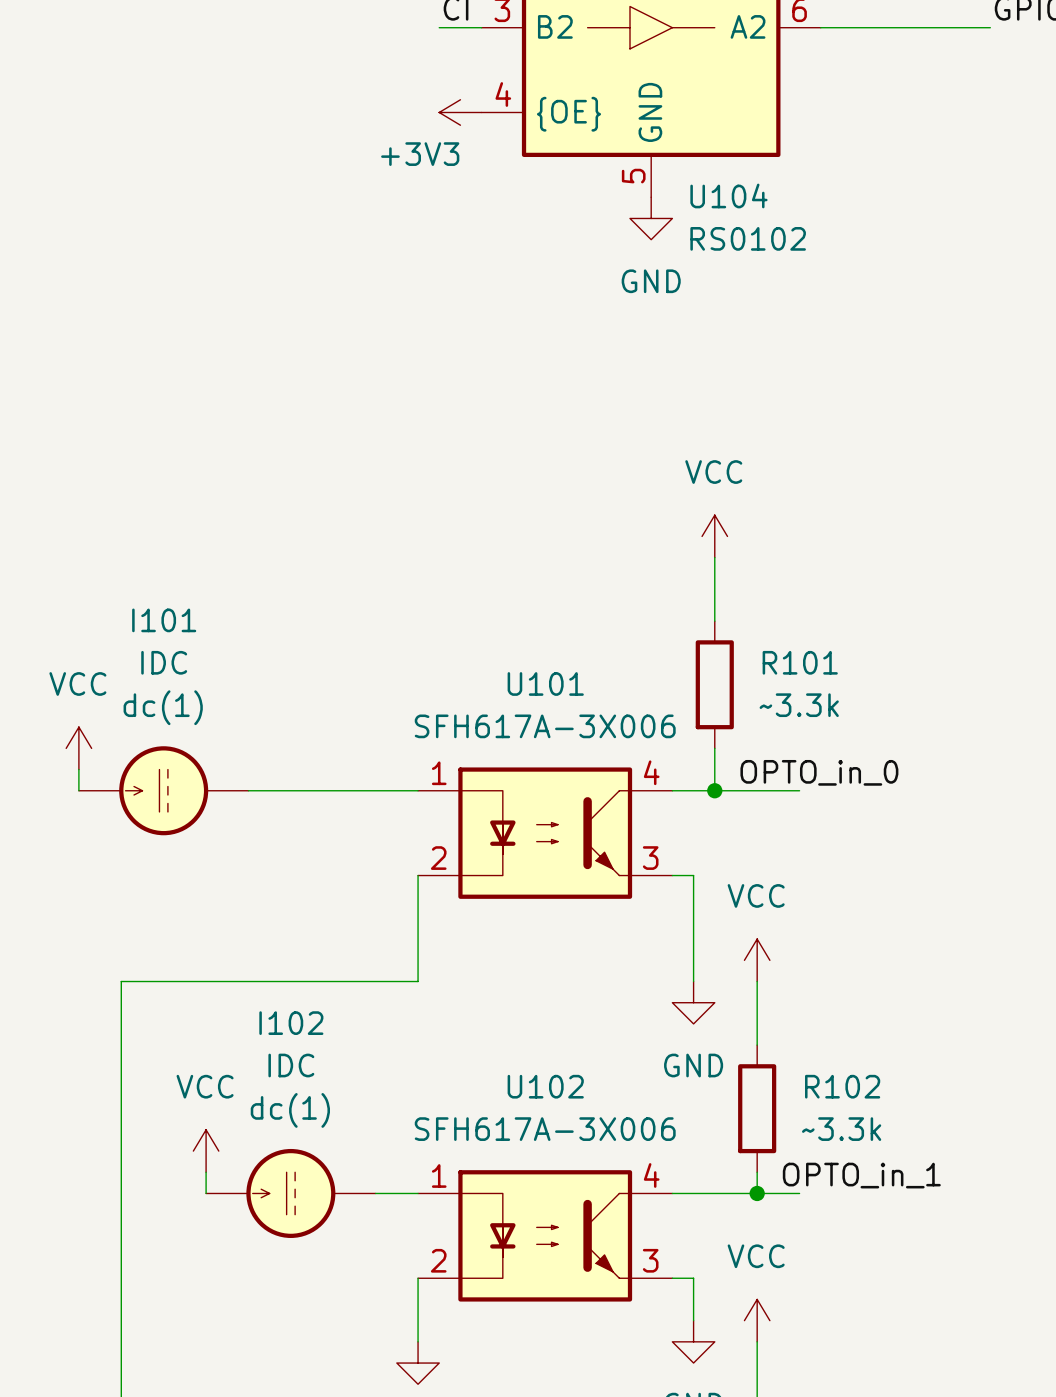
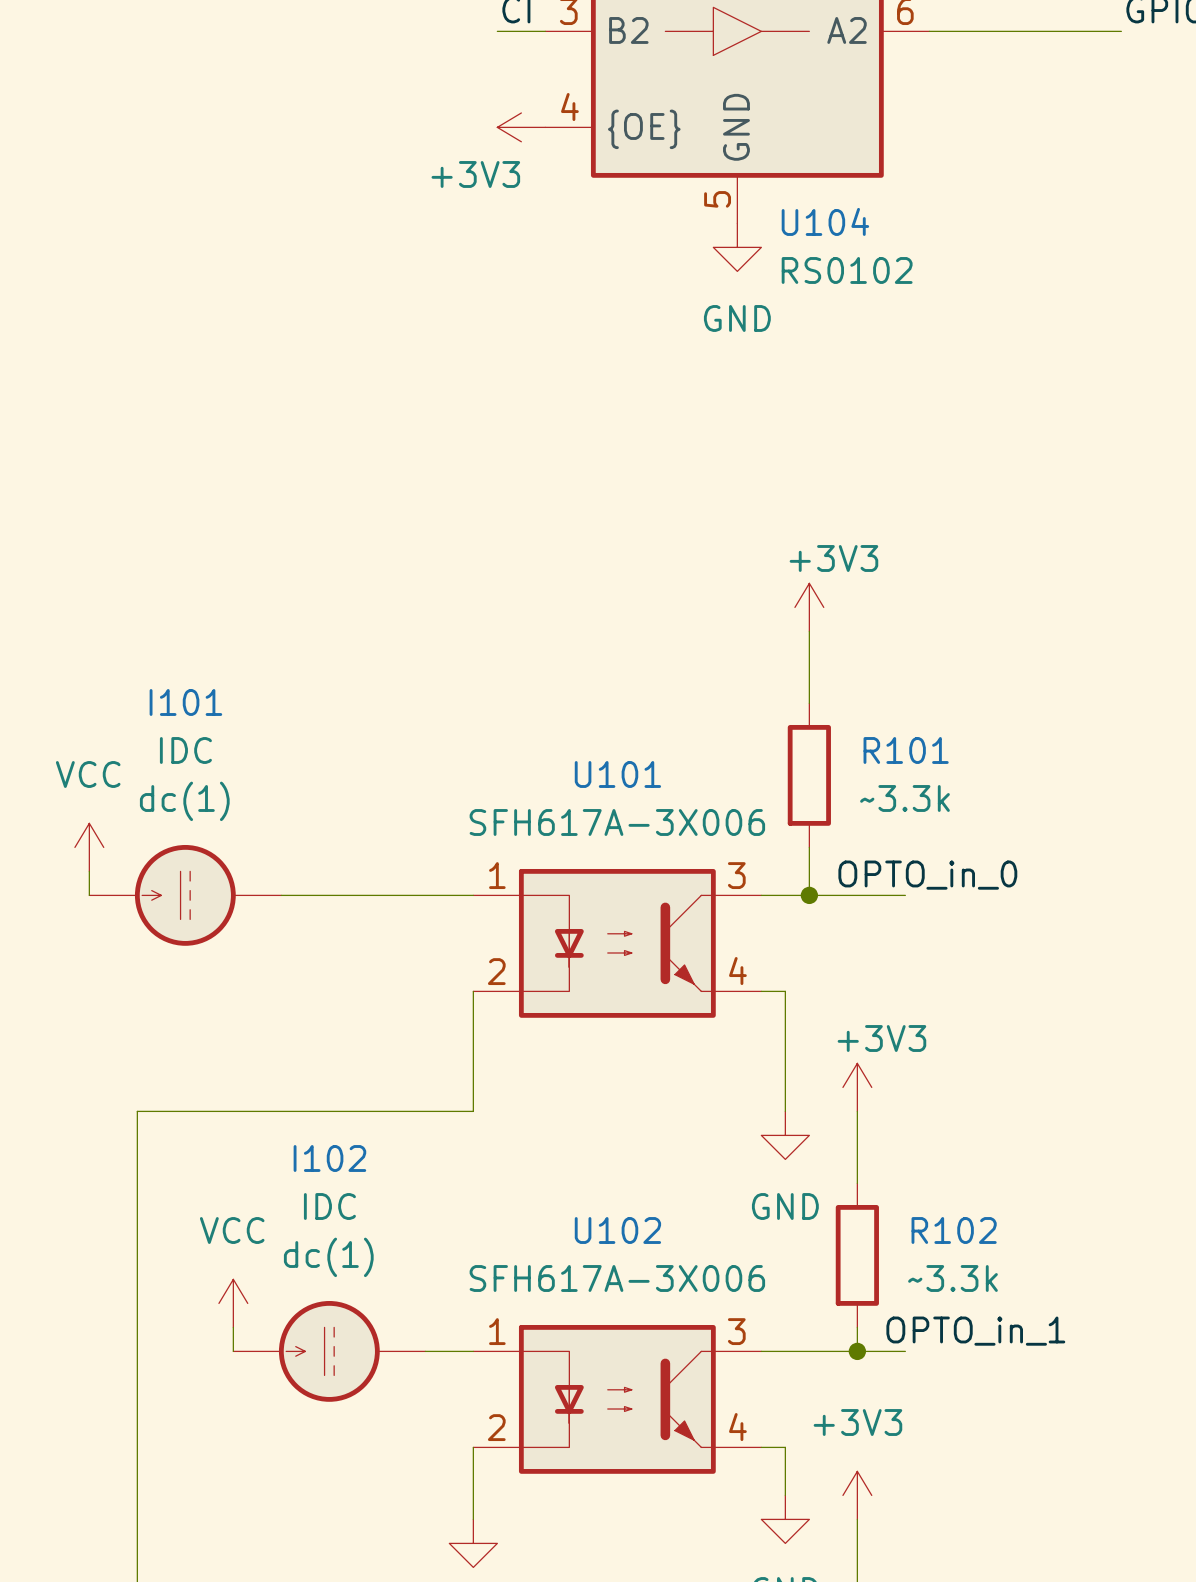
power symbol: VCC (714, 536) -> +3V3 (809, 607)
U101 pin number: 4 (651, 772) -> 3 (736, 875)
U101 pin number: 3 (650, 858) -> 4 (737, 971)
power symbol: VCC (757, 960) -> +3V3 (857, 1087)
U102 pin number: 4 (651, 1175) -> 3 (736, 1331)
U102 pin number: 3 (650, 1260) -> 4 (737, 1427)
power symbol: VCC (757, 1320) -> +3V3 (857, 1495)

